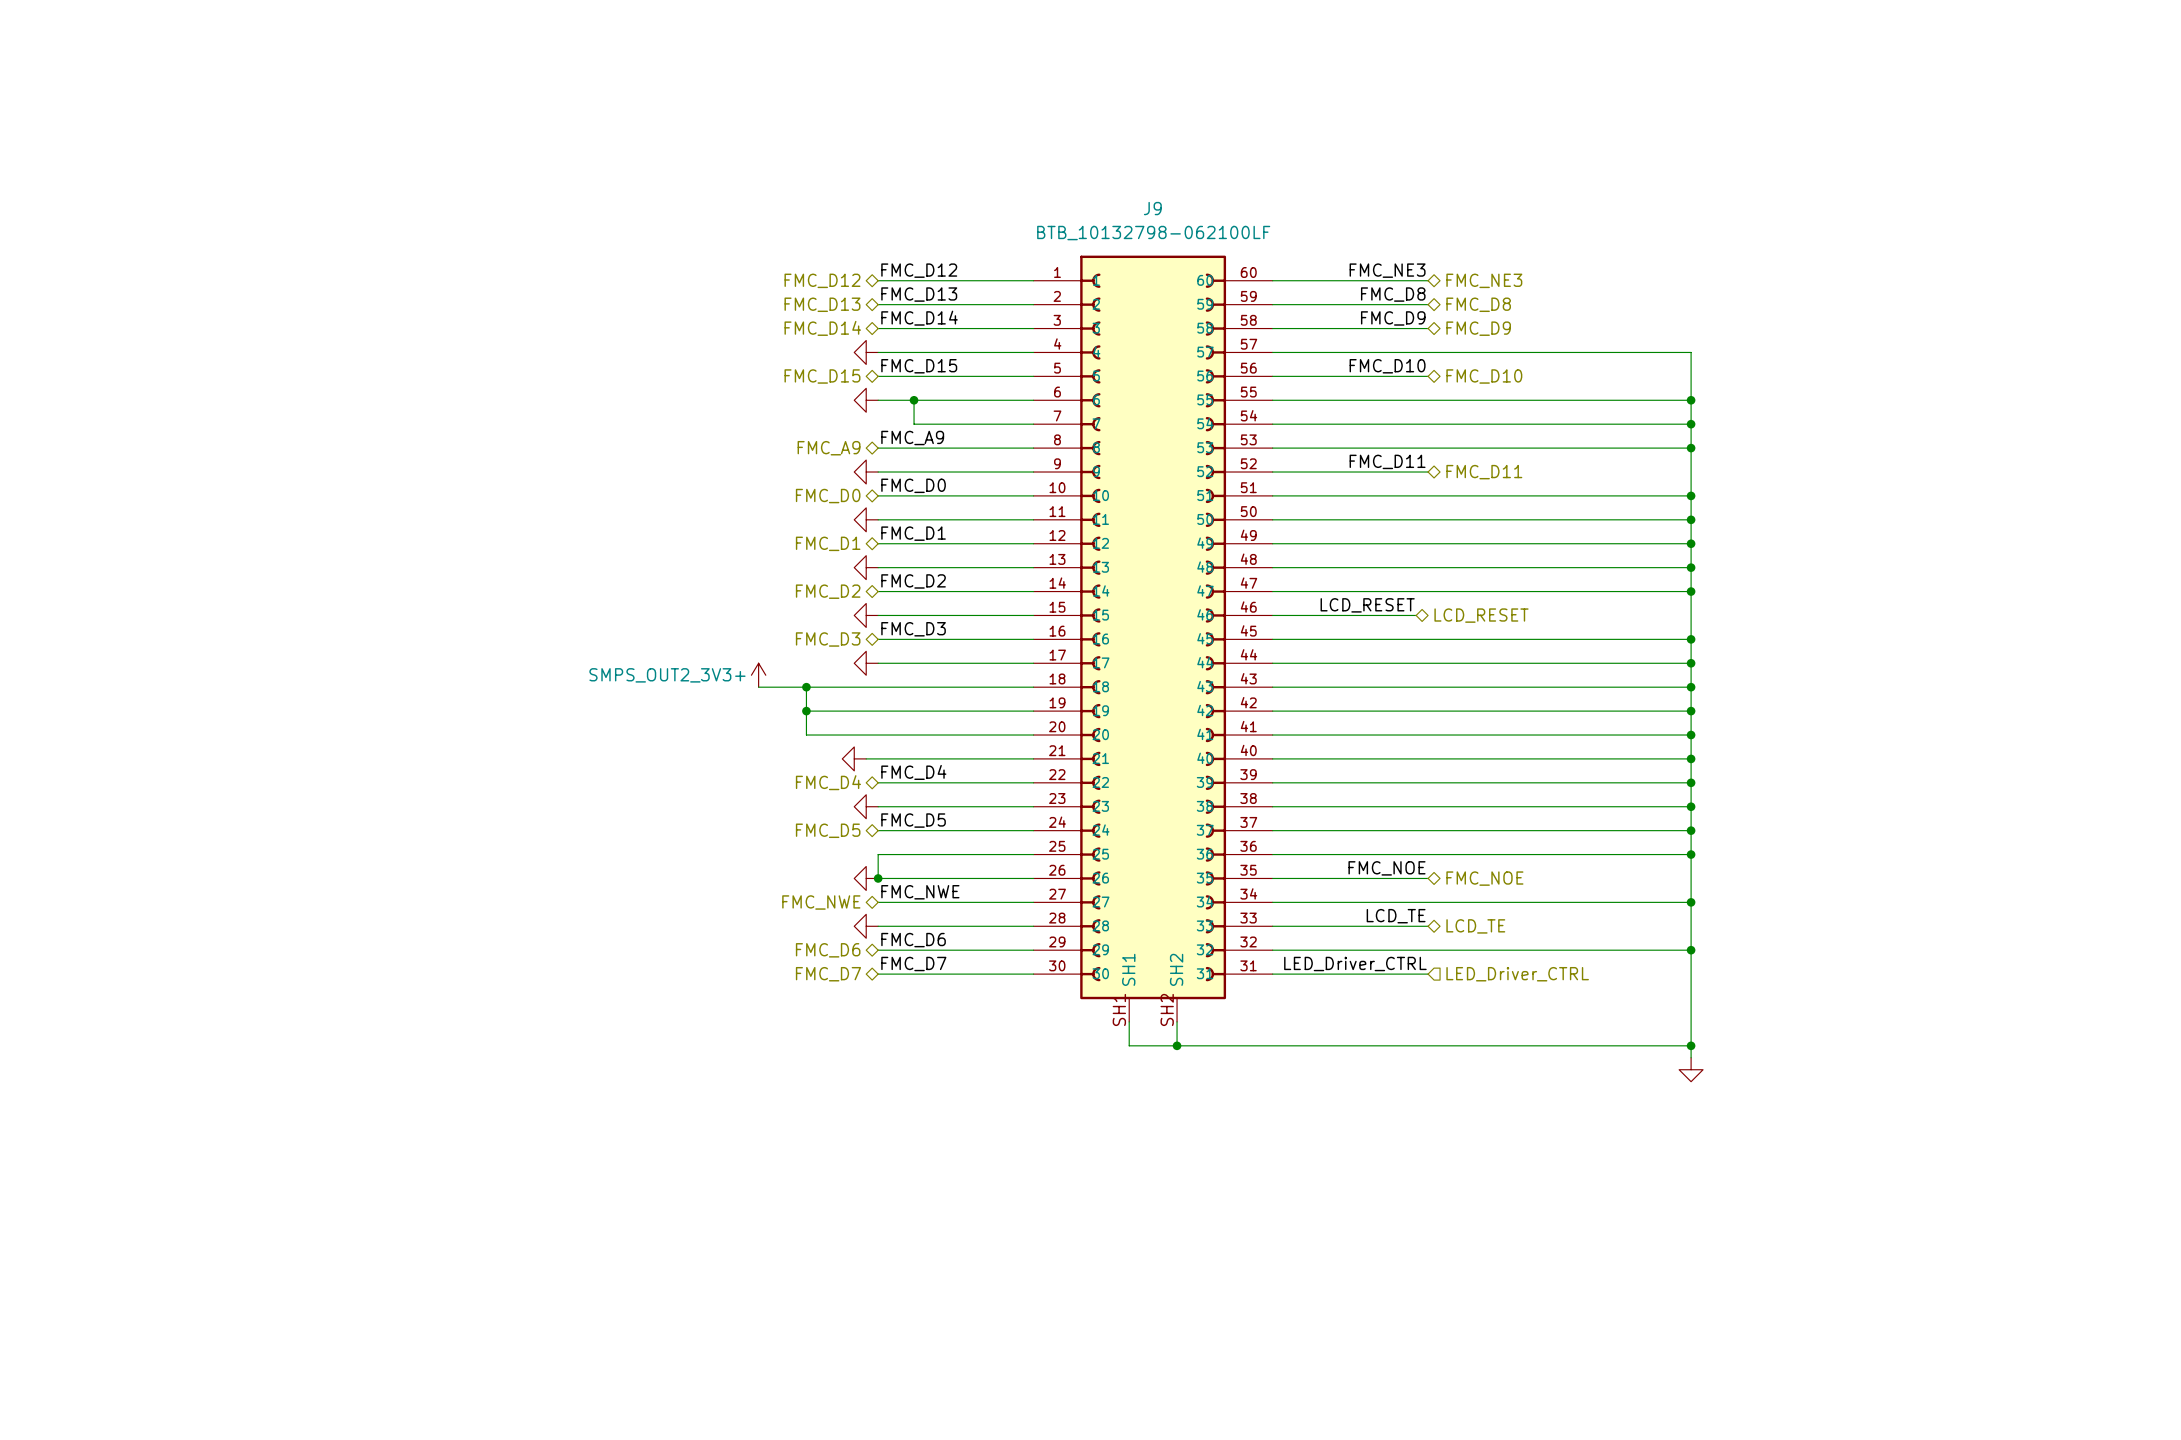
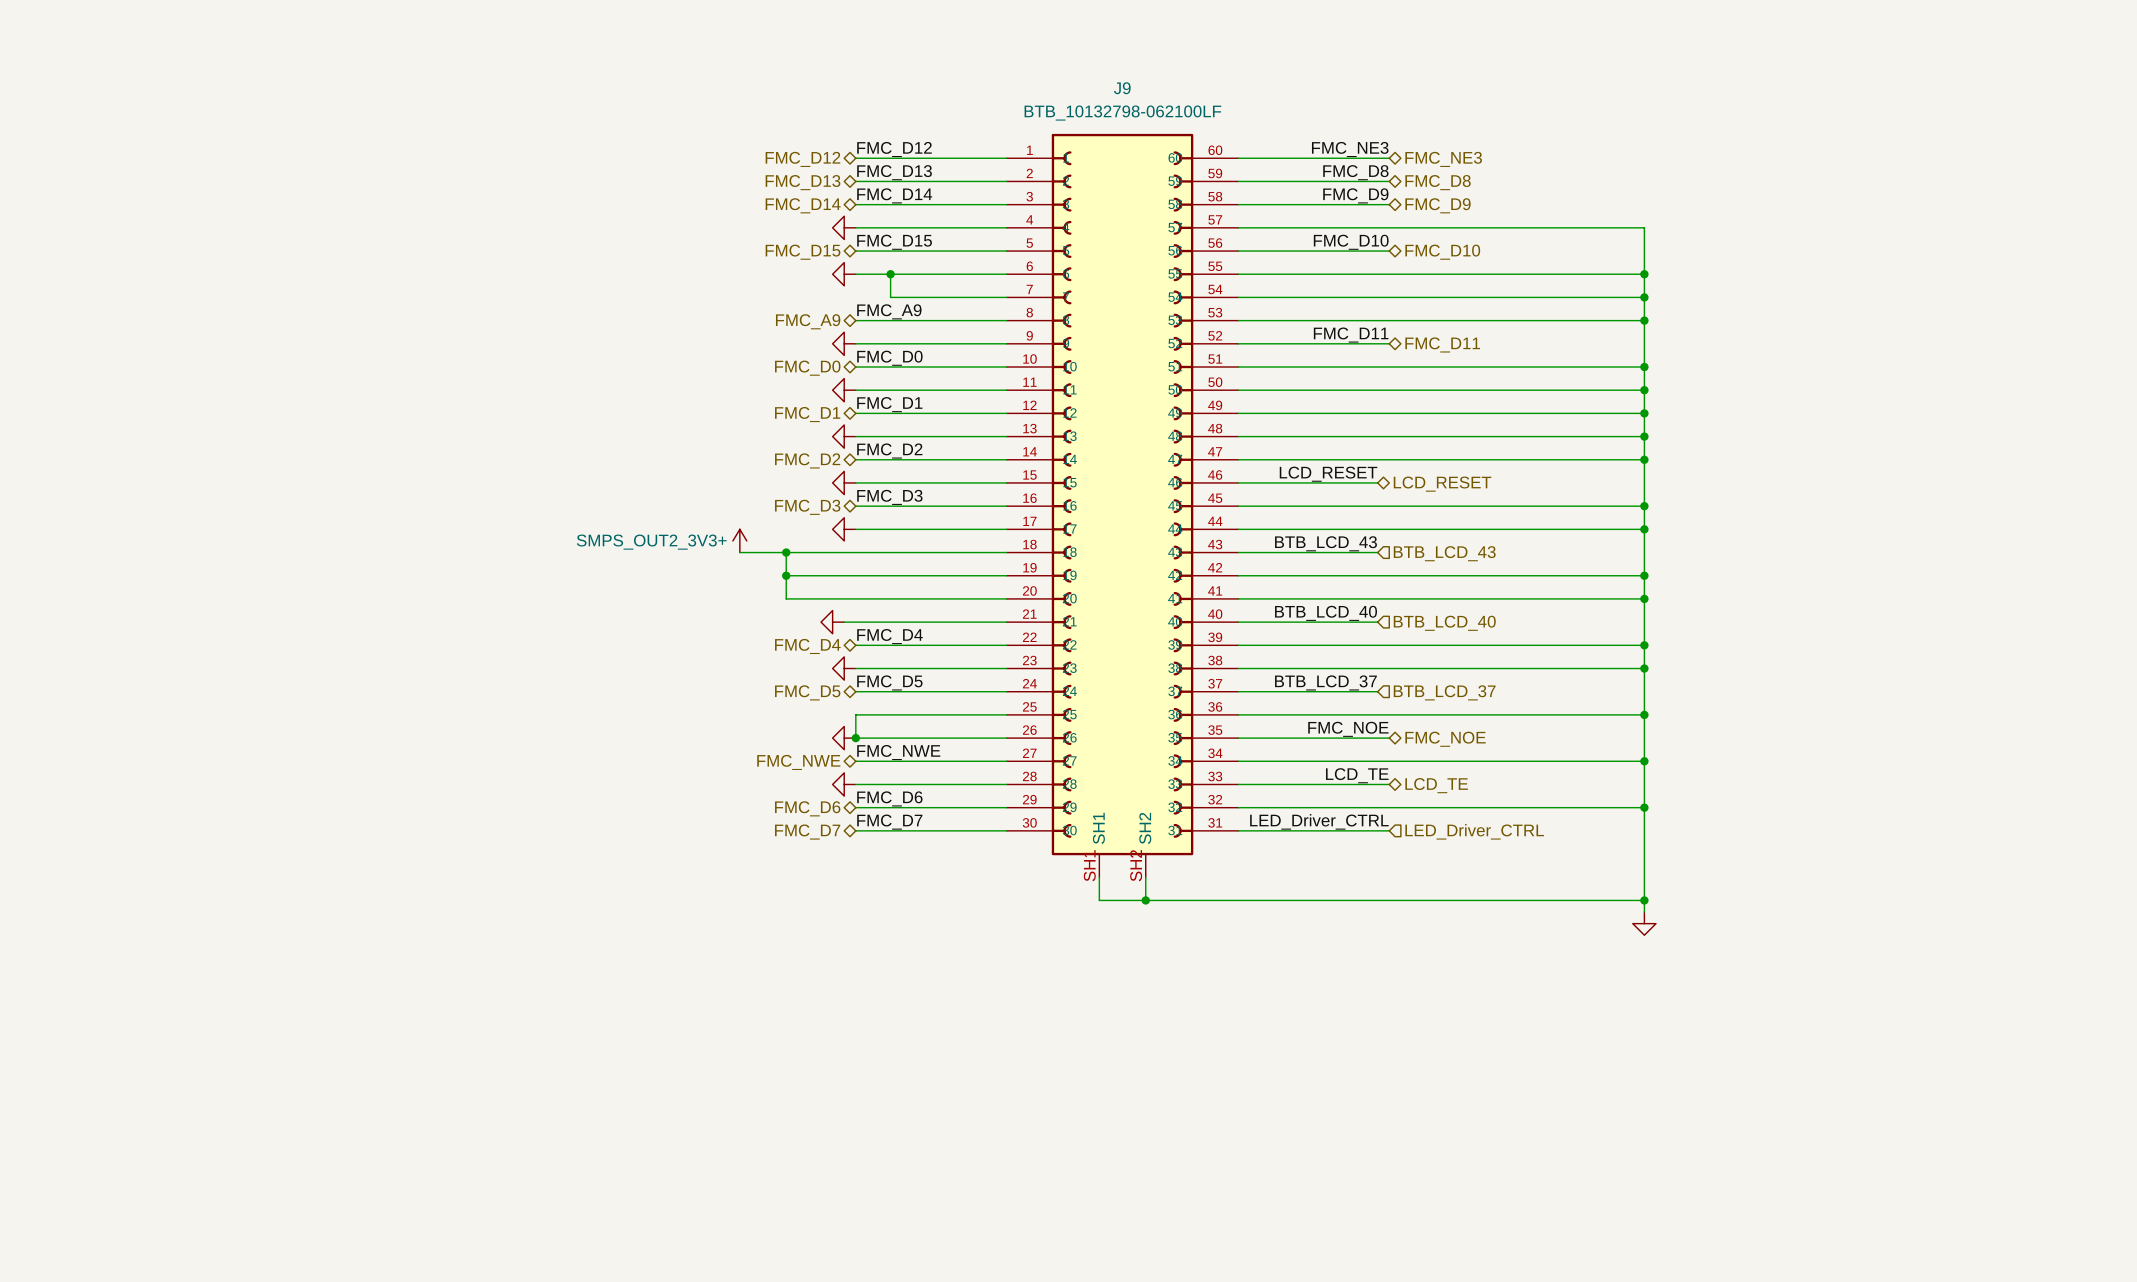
label: none -> BTB_LCD_43 (1325, 543)
wire: (1416, 687) (1691, 687) -> none
hierarchical label: none -> BTB_LCD_43 (1444, 553)
junction: (1691, 687) -> none
label: none -> BTB_LCD_40 (1326, 613)
wire: (1416, 758) (1691, 758) -> none
hierarchical label: none -> BTB_LCD_40 (1444, 623)
junction: (1691, 758) -> none
label: none -> BTB_LCD_37 (1325, 682)
wire: (1416, 830) (1691, 830) -> none
hierarchical label: none -> BTB_LCD_37 (1444, 692)
junction: (1691, 830) -> none

